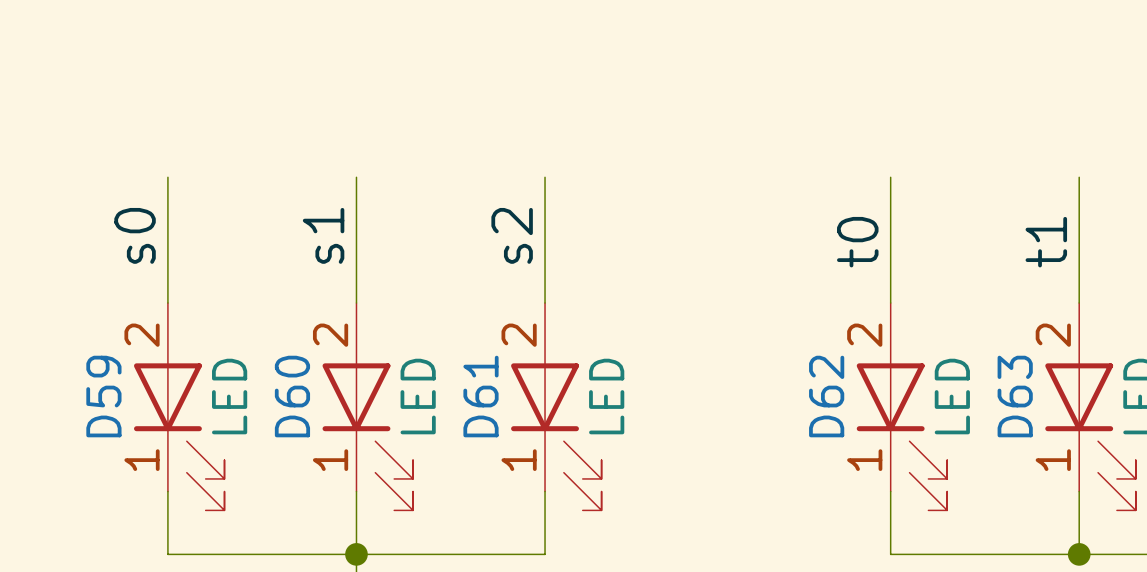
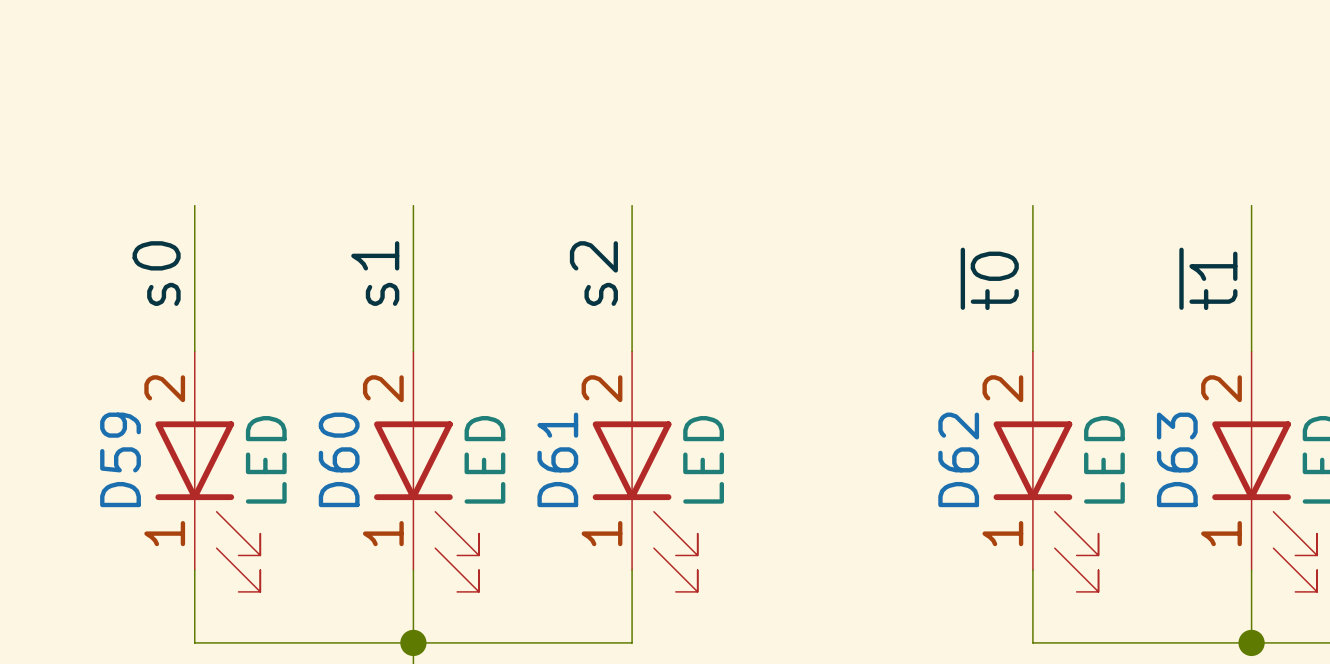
label: t0 (857, 242) -> ~{t0} (989, 278)
label: t1 (1046, 242) -> ~{t1} (1208, 278)

